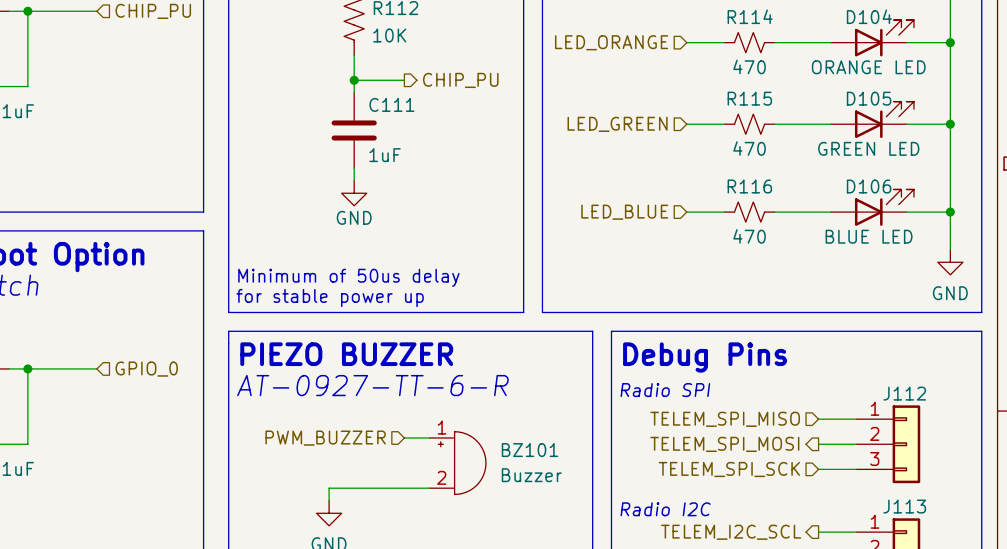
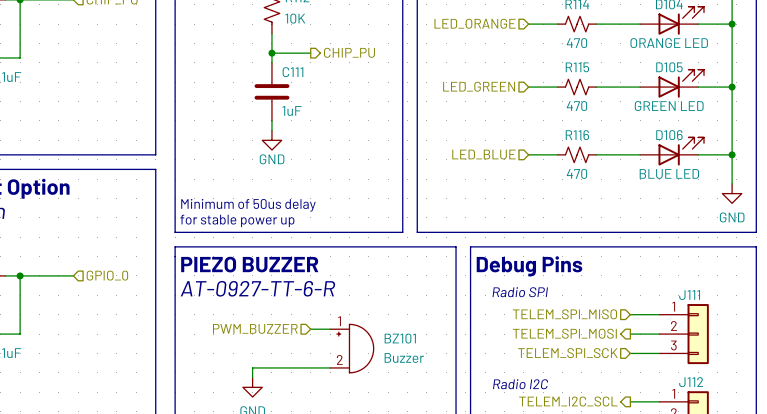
J112 name: J112 (904, 393) -> J111 (689, 295)
J113 name: J113 (904, 506) -> J112 (691, 382)

